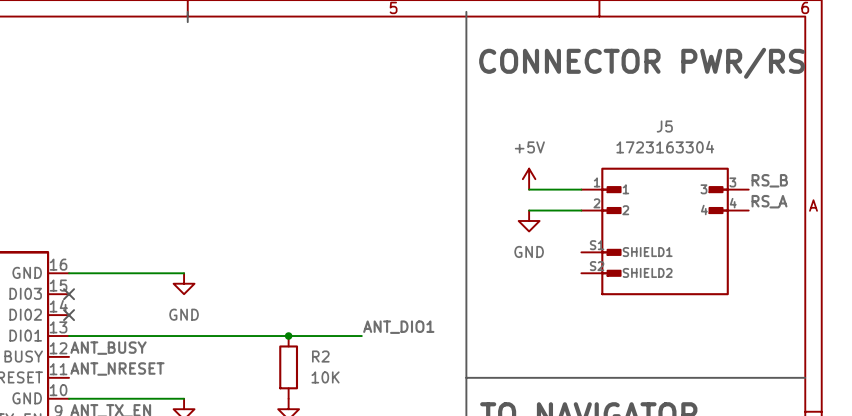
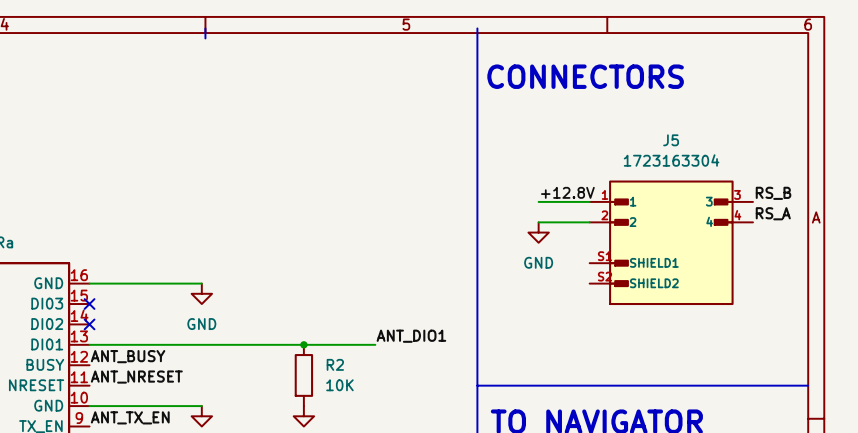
text: CONNECTOR PWR/RS (642, 63) -> CONNECTORS (585, 76)
power symbol: +5V (529, 179) -> none
label: none -> +12.8V (567, 192)

